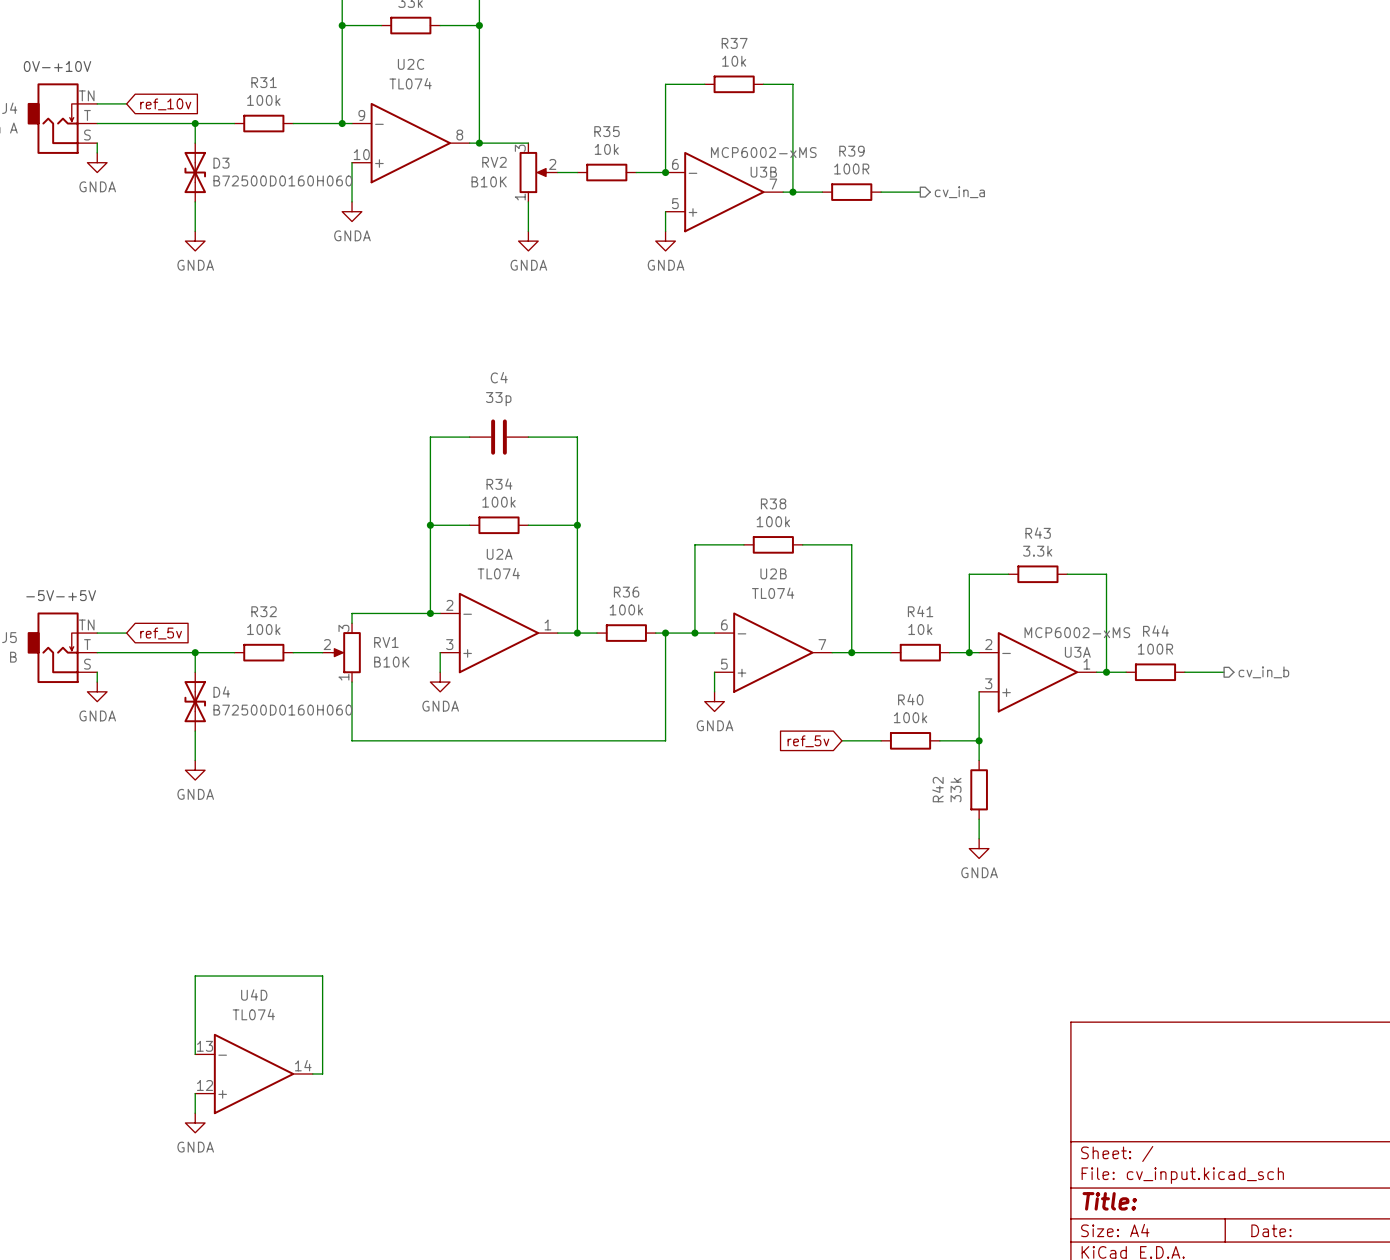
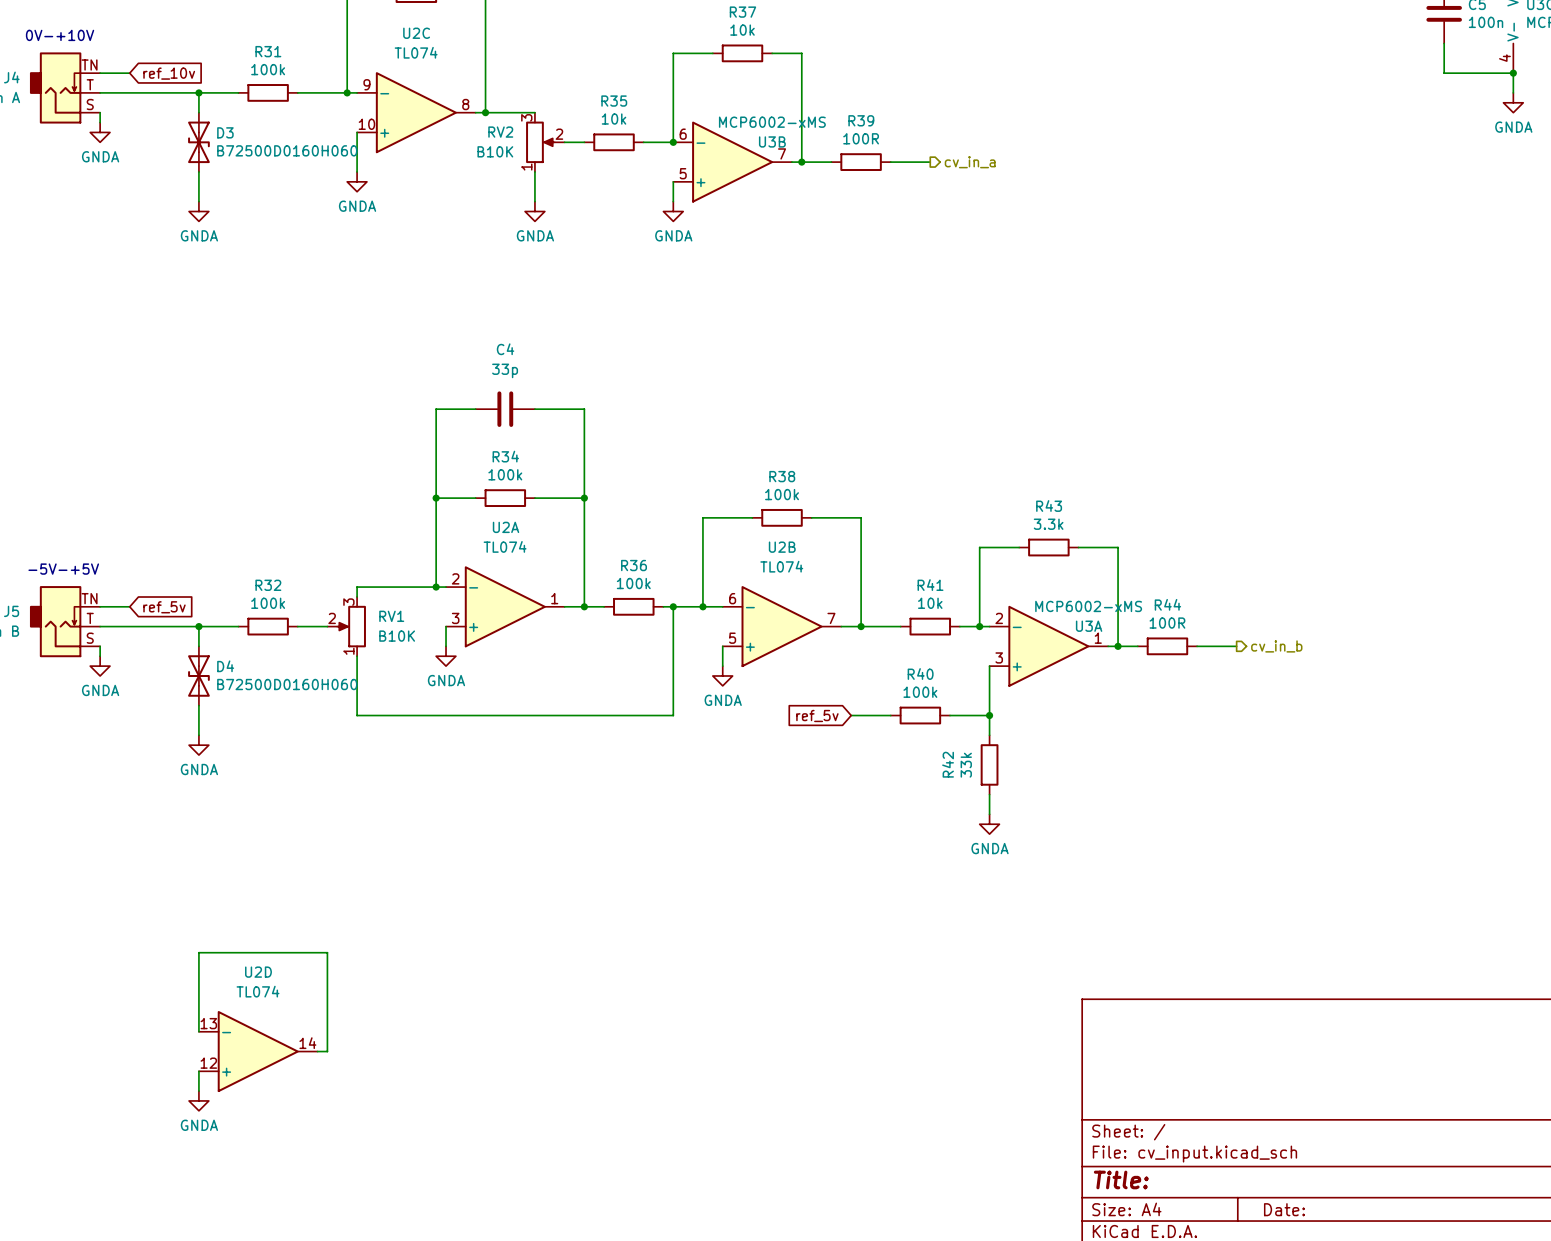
U4D name: U4D (254, 995) -> U2D (258, 972)

